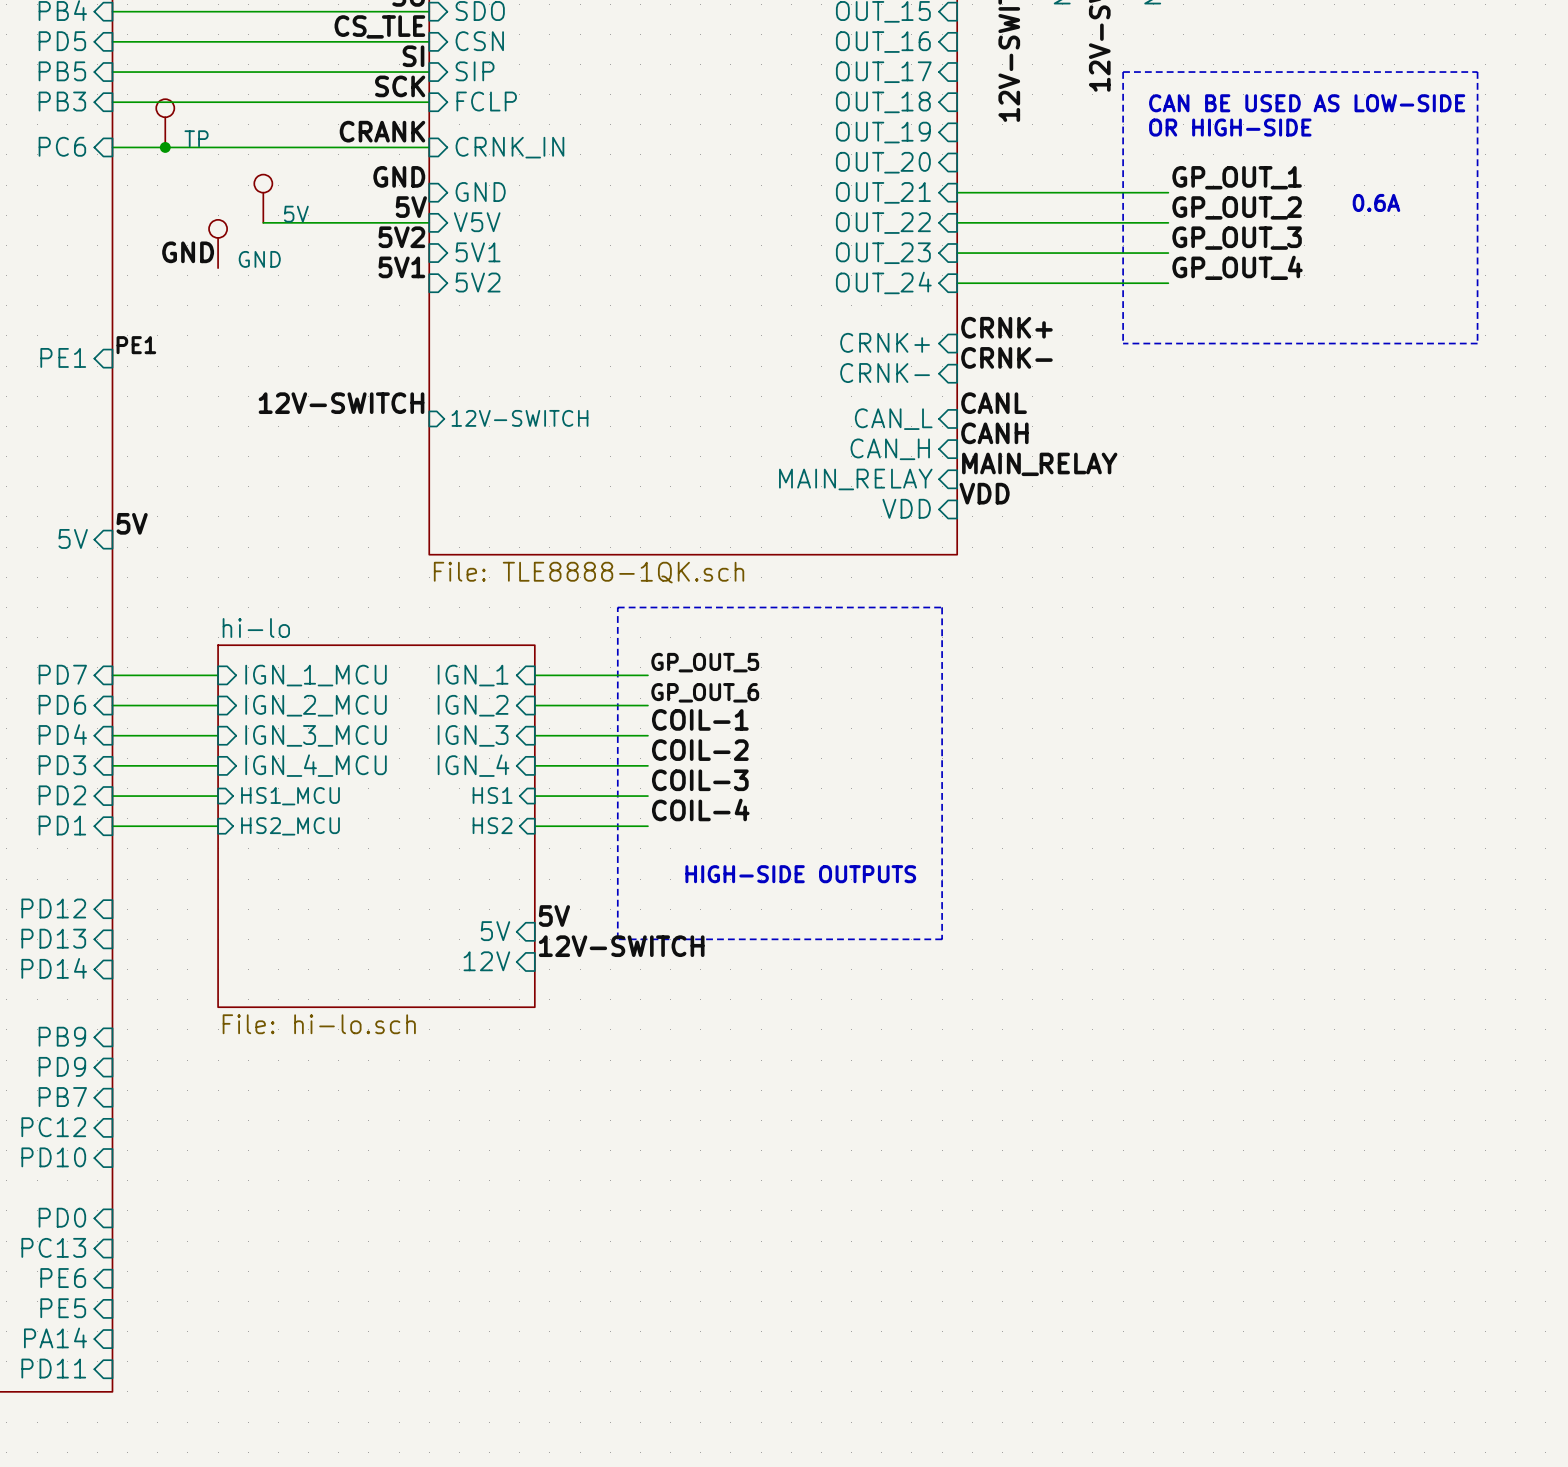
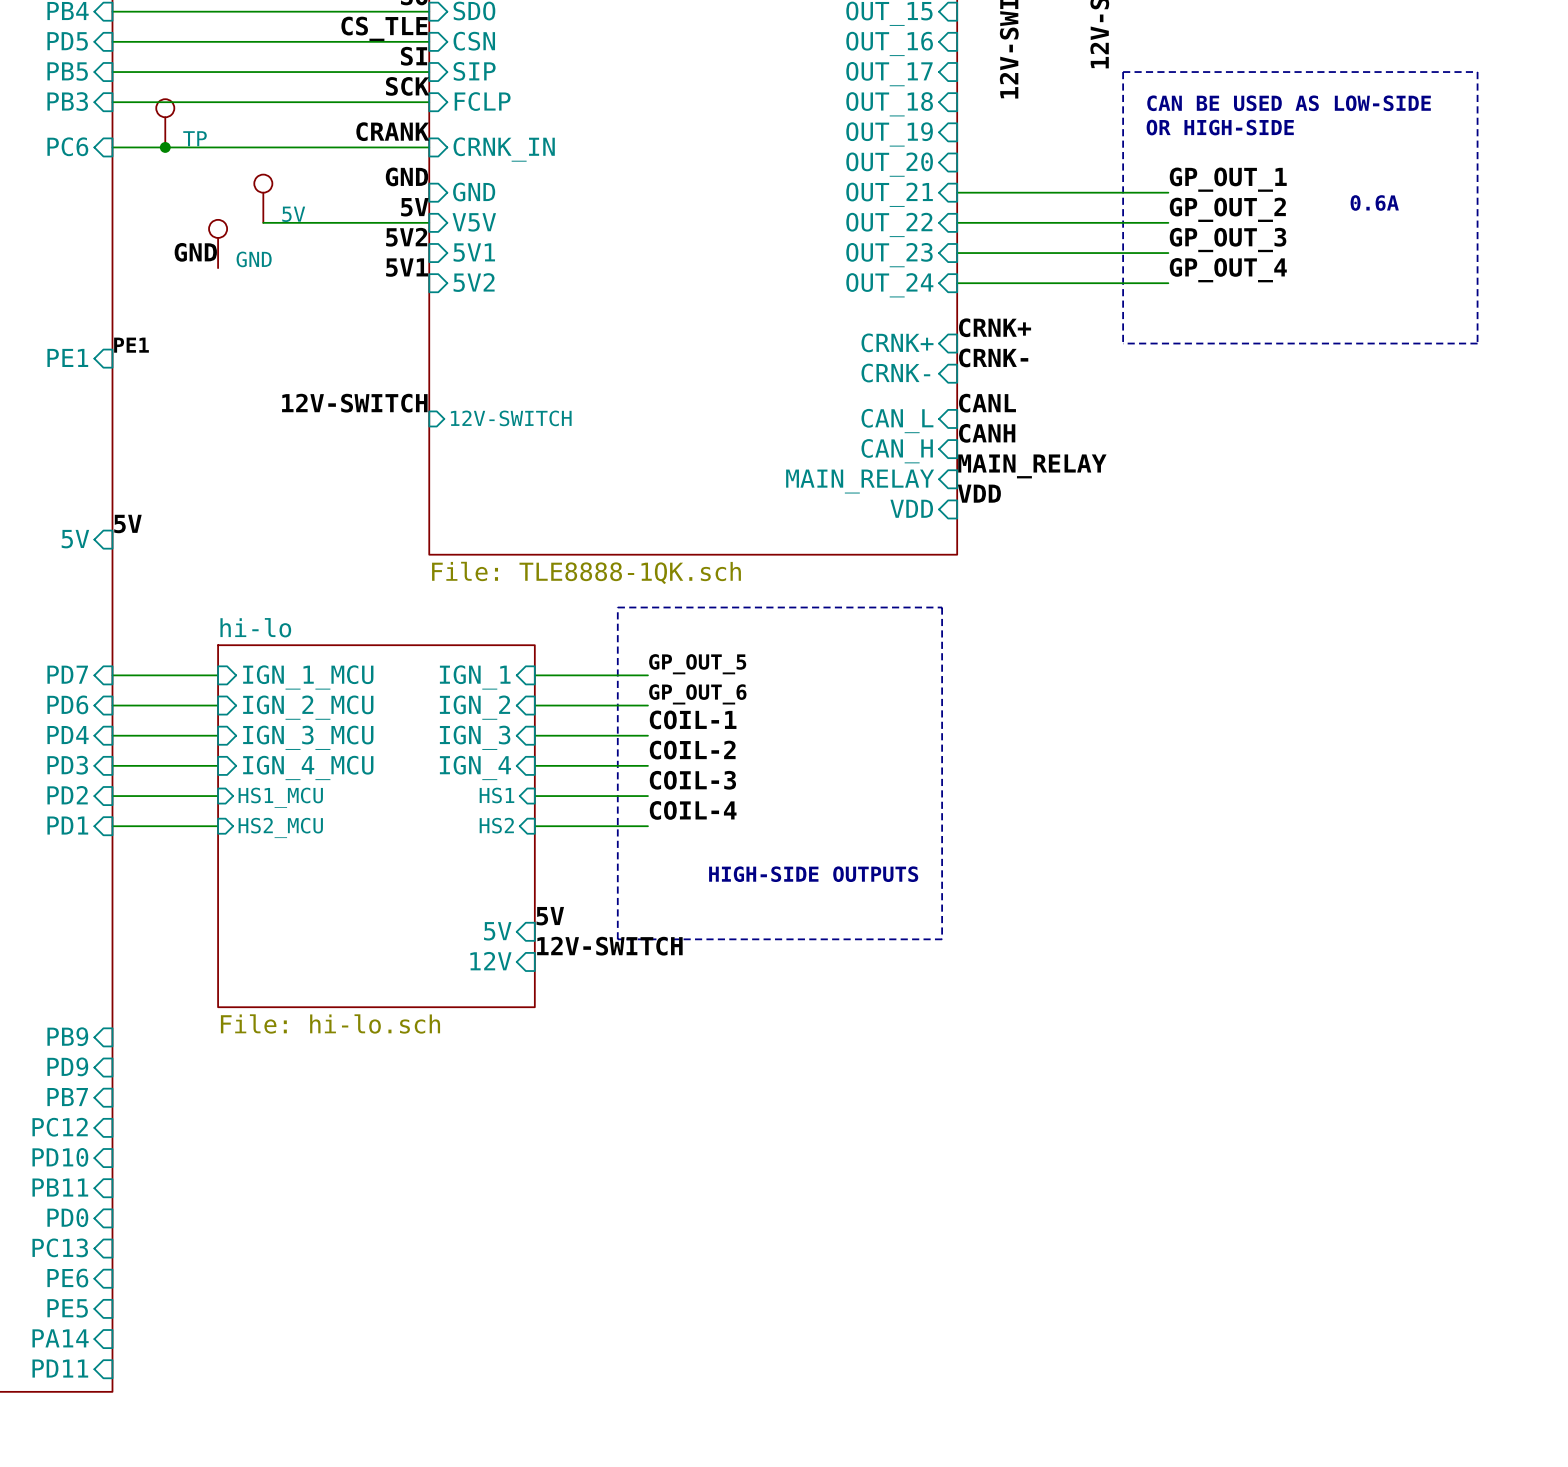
sheet pin: PD12 (53, 908) -> none
sheet pin: PD13 (53, 938) -> none
sheet pin: PD14 (54, 968) -> none
sheet pin: none -> PB11 (60, 1187)

